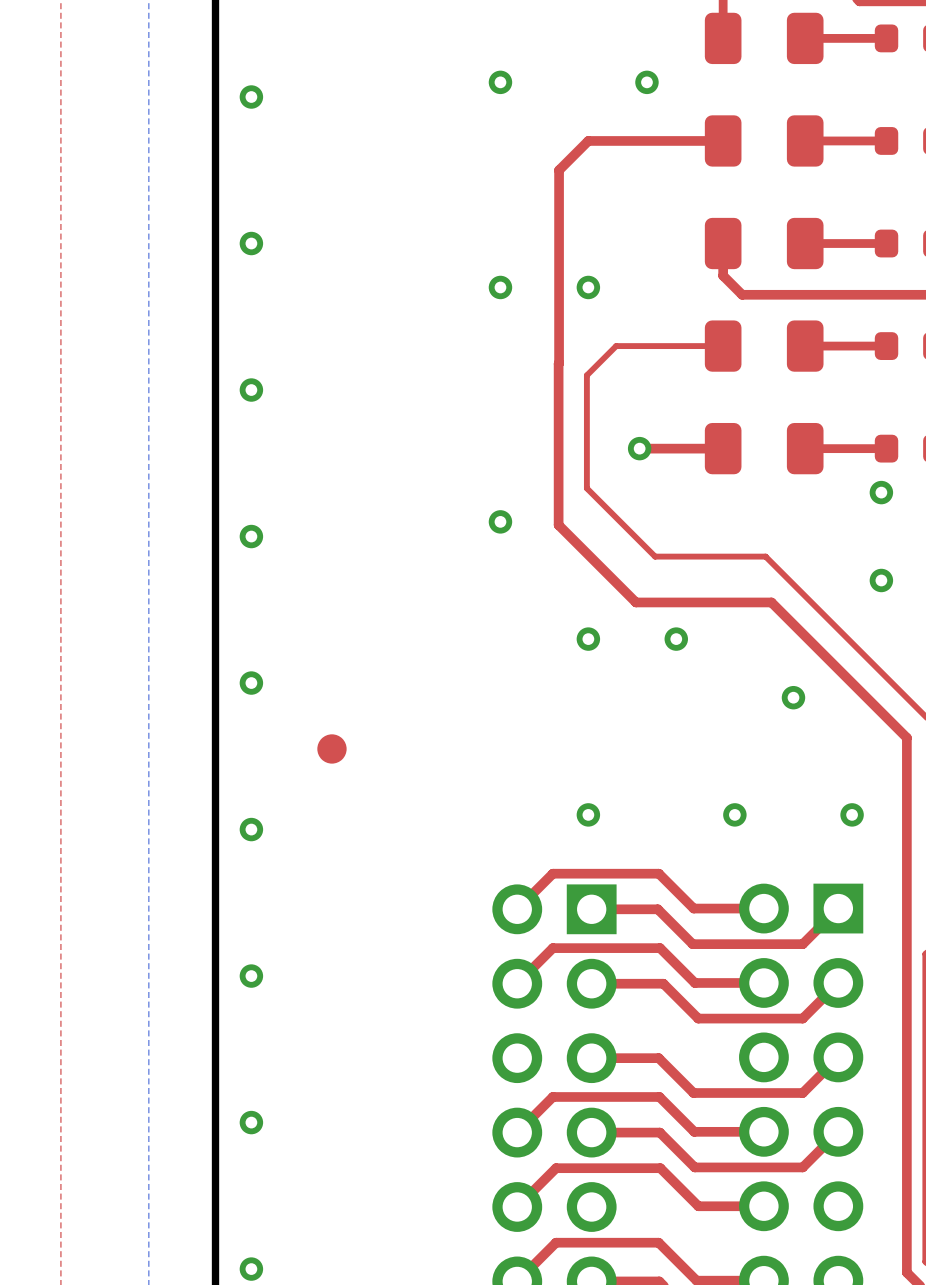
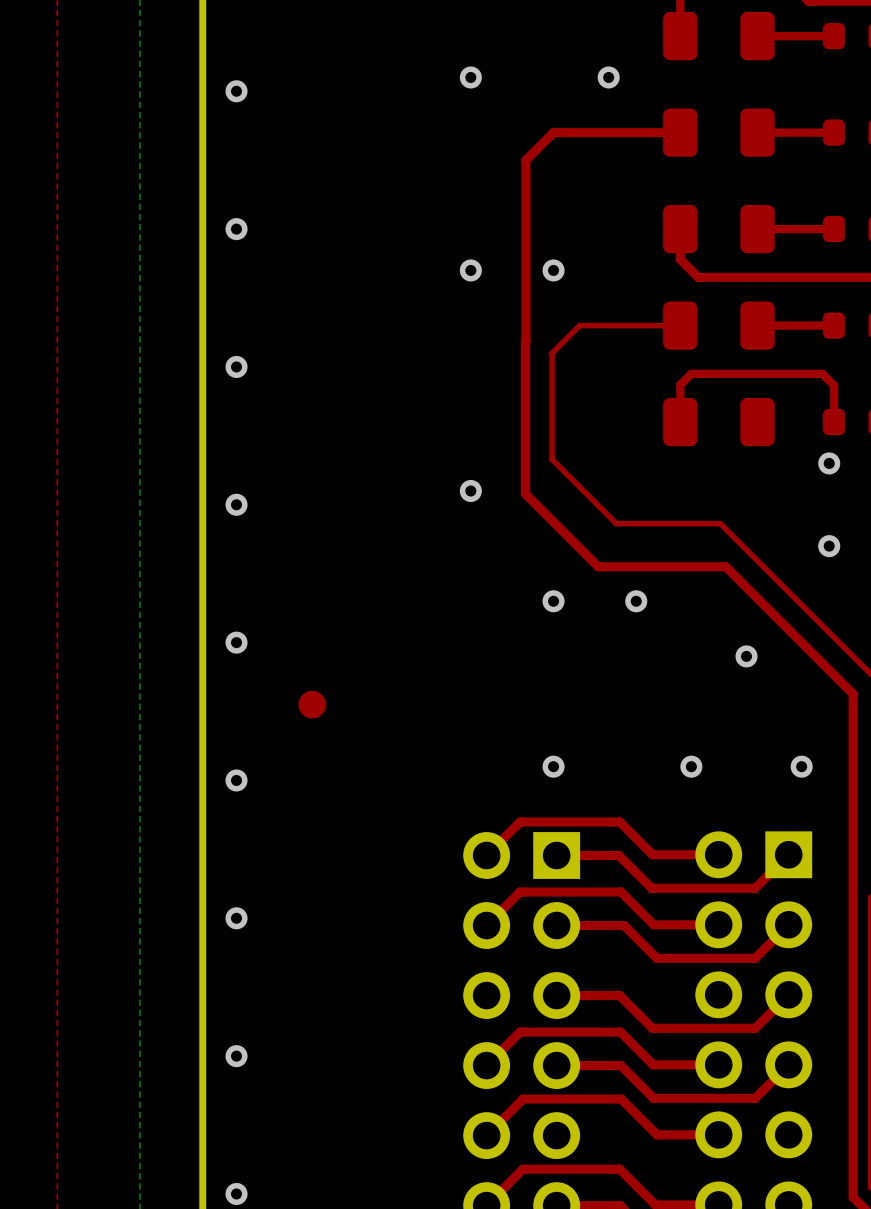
via: (639, 448) -> none
top track: (723, 448) (639, 448) -> none
top track: (886, 448) (805, 448) -> (834, 422) (834, 385) (822, 373) (691, 373) (680, 384) (680, 422)

